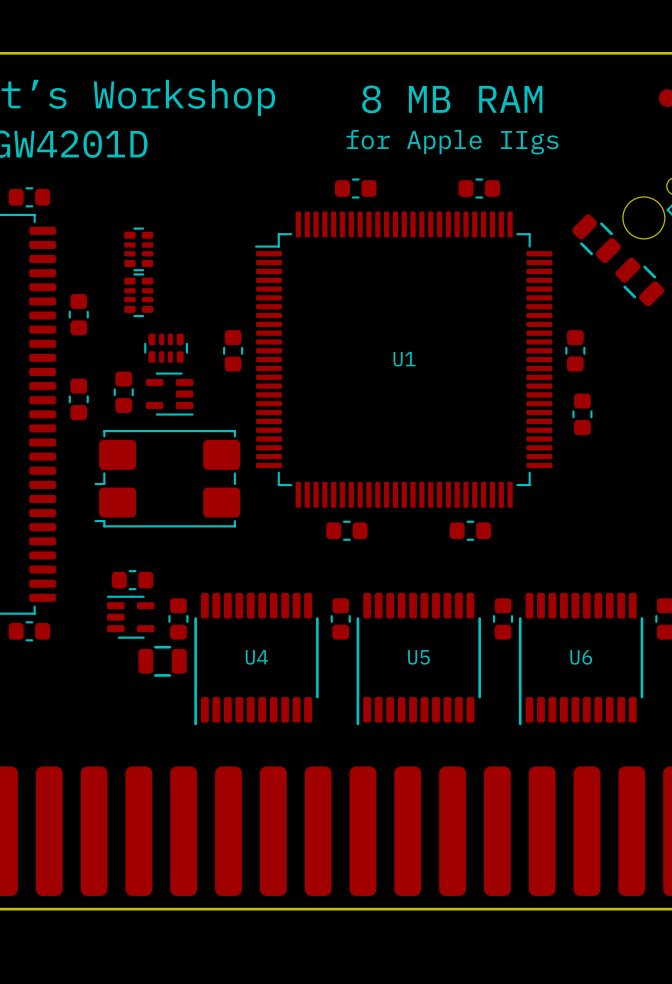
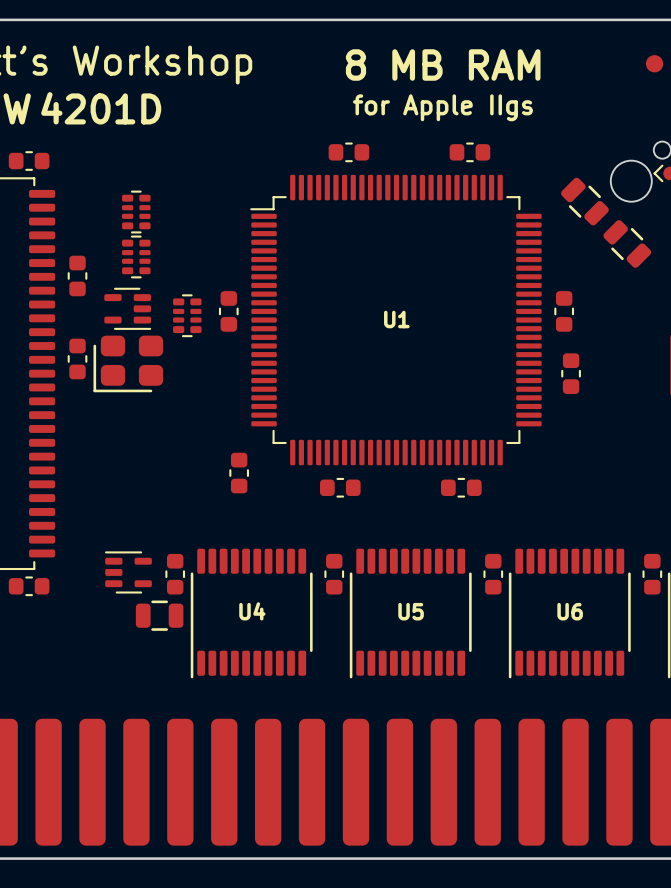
part rotation: 0° (166, 348) -> 90° clockwise (187, 315)
part footprint: [113, 371, 134, 414] -> [93, 335, 164, 393]
part position: (169, 394) -> (127, 308)
part: (167, 478) -> none
part rotation: 0° (132, 580) -> 90° clockwise (239, 473)
part position: (132, 580) -> (239, 473)

